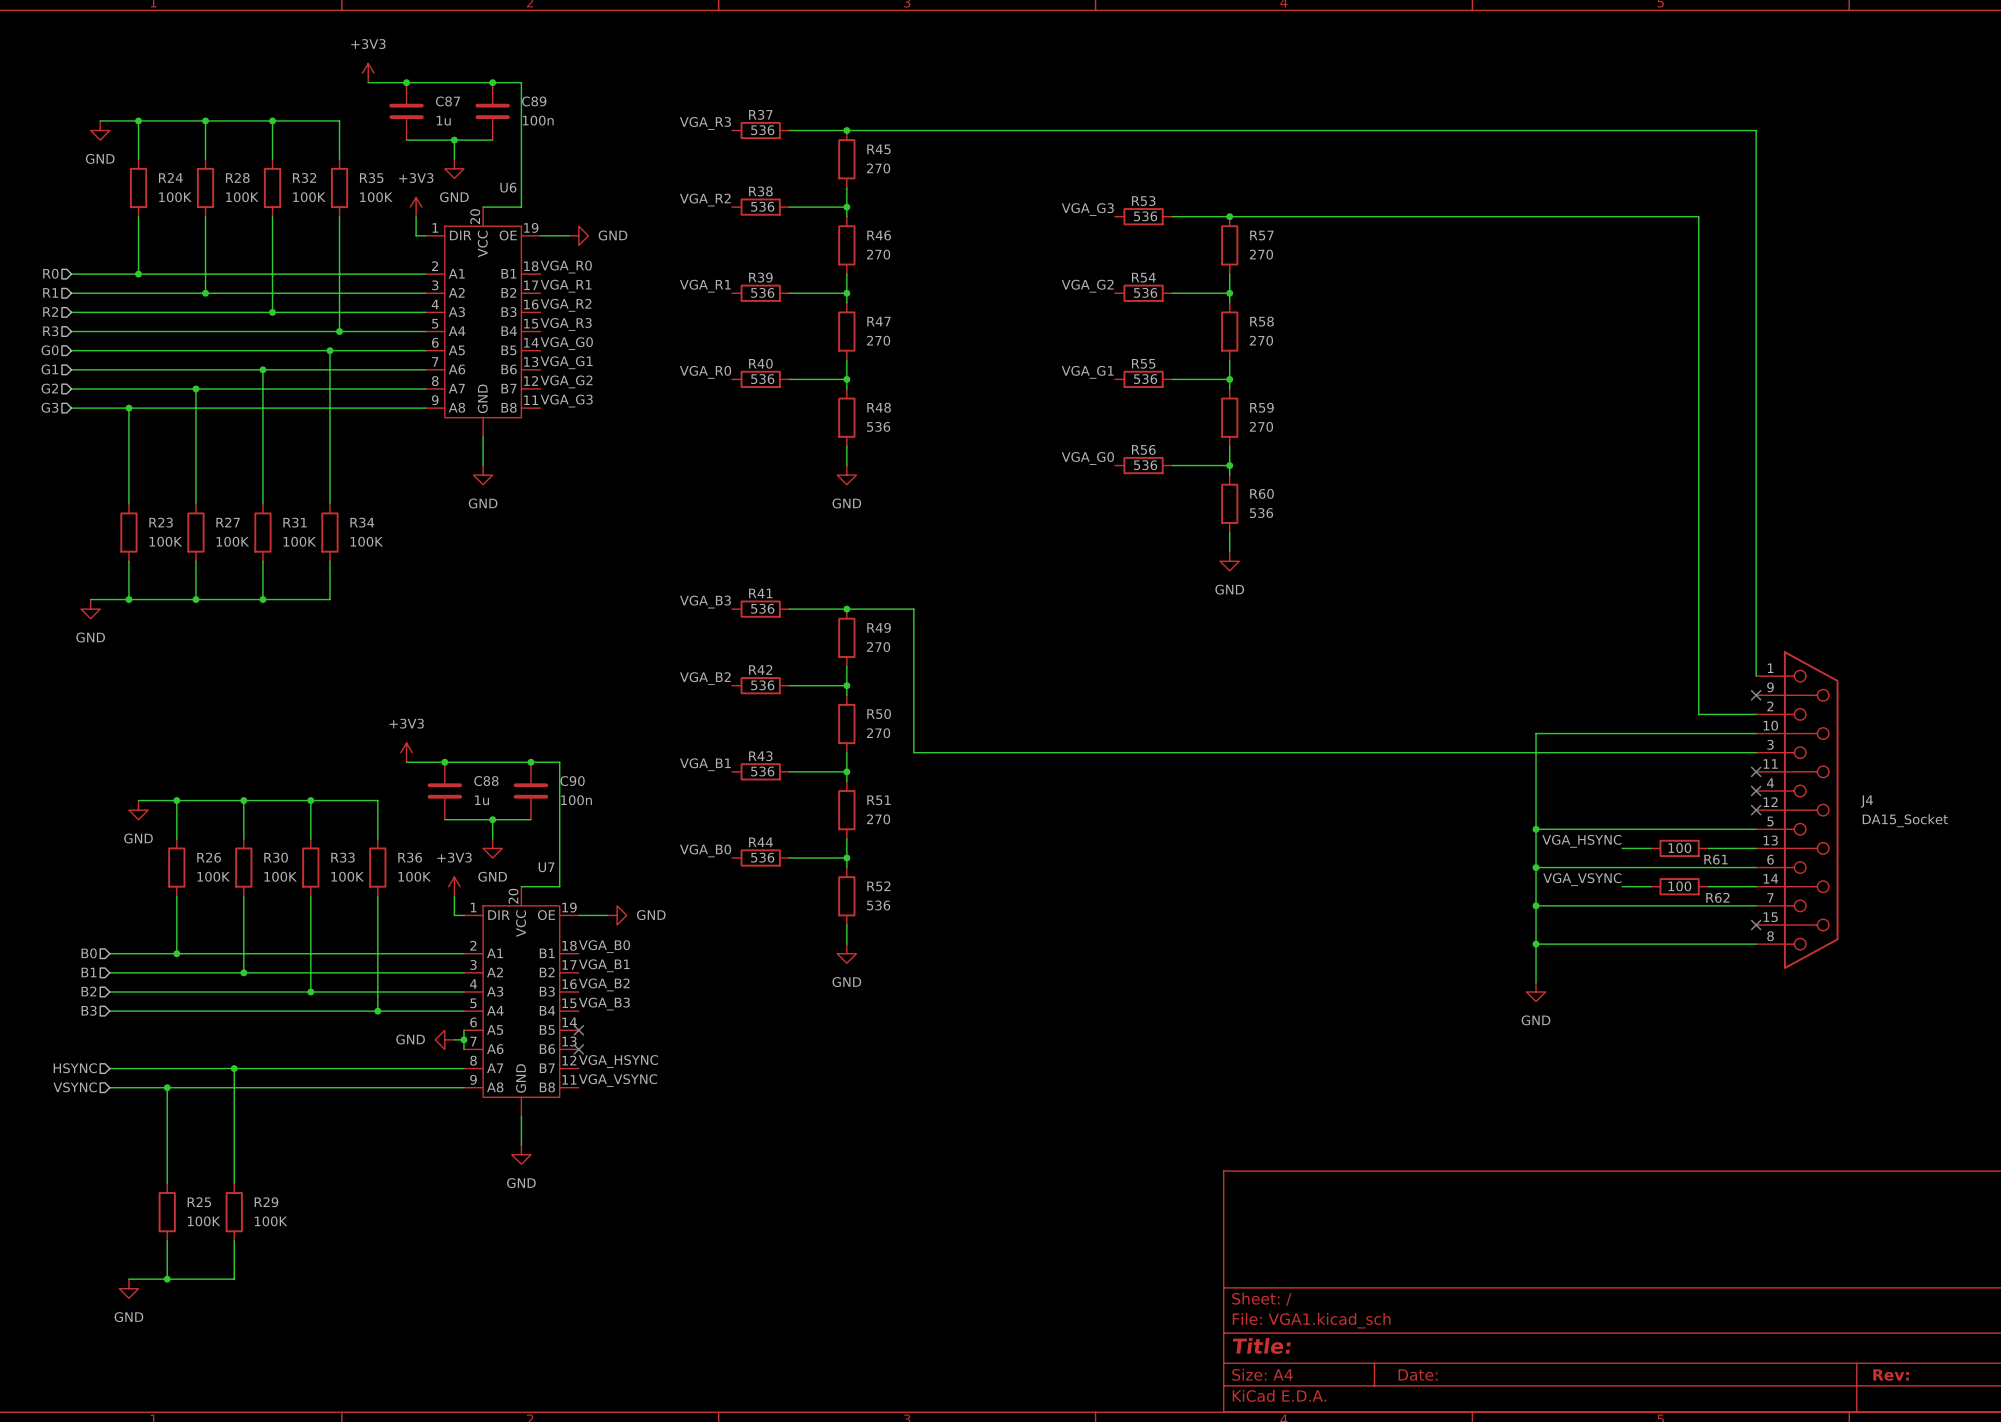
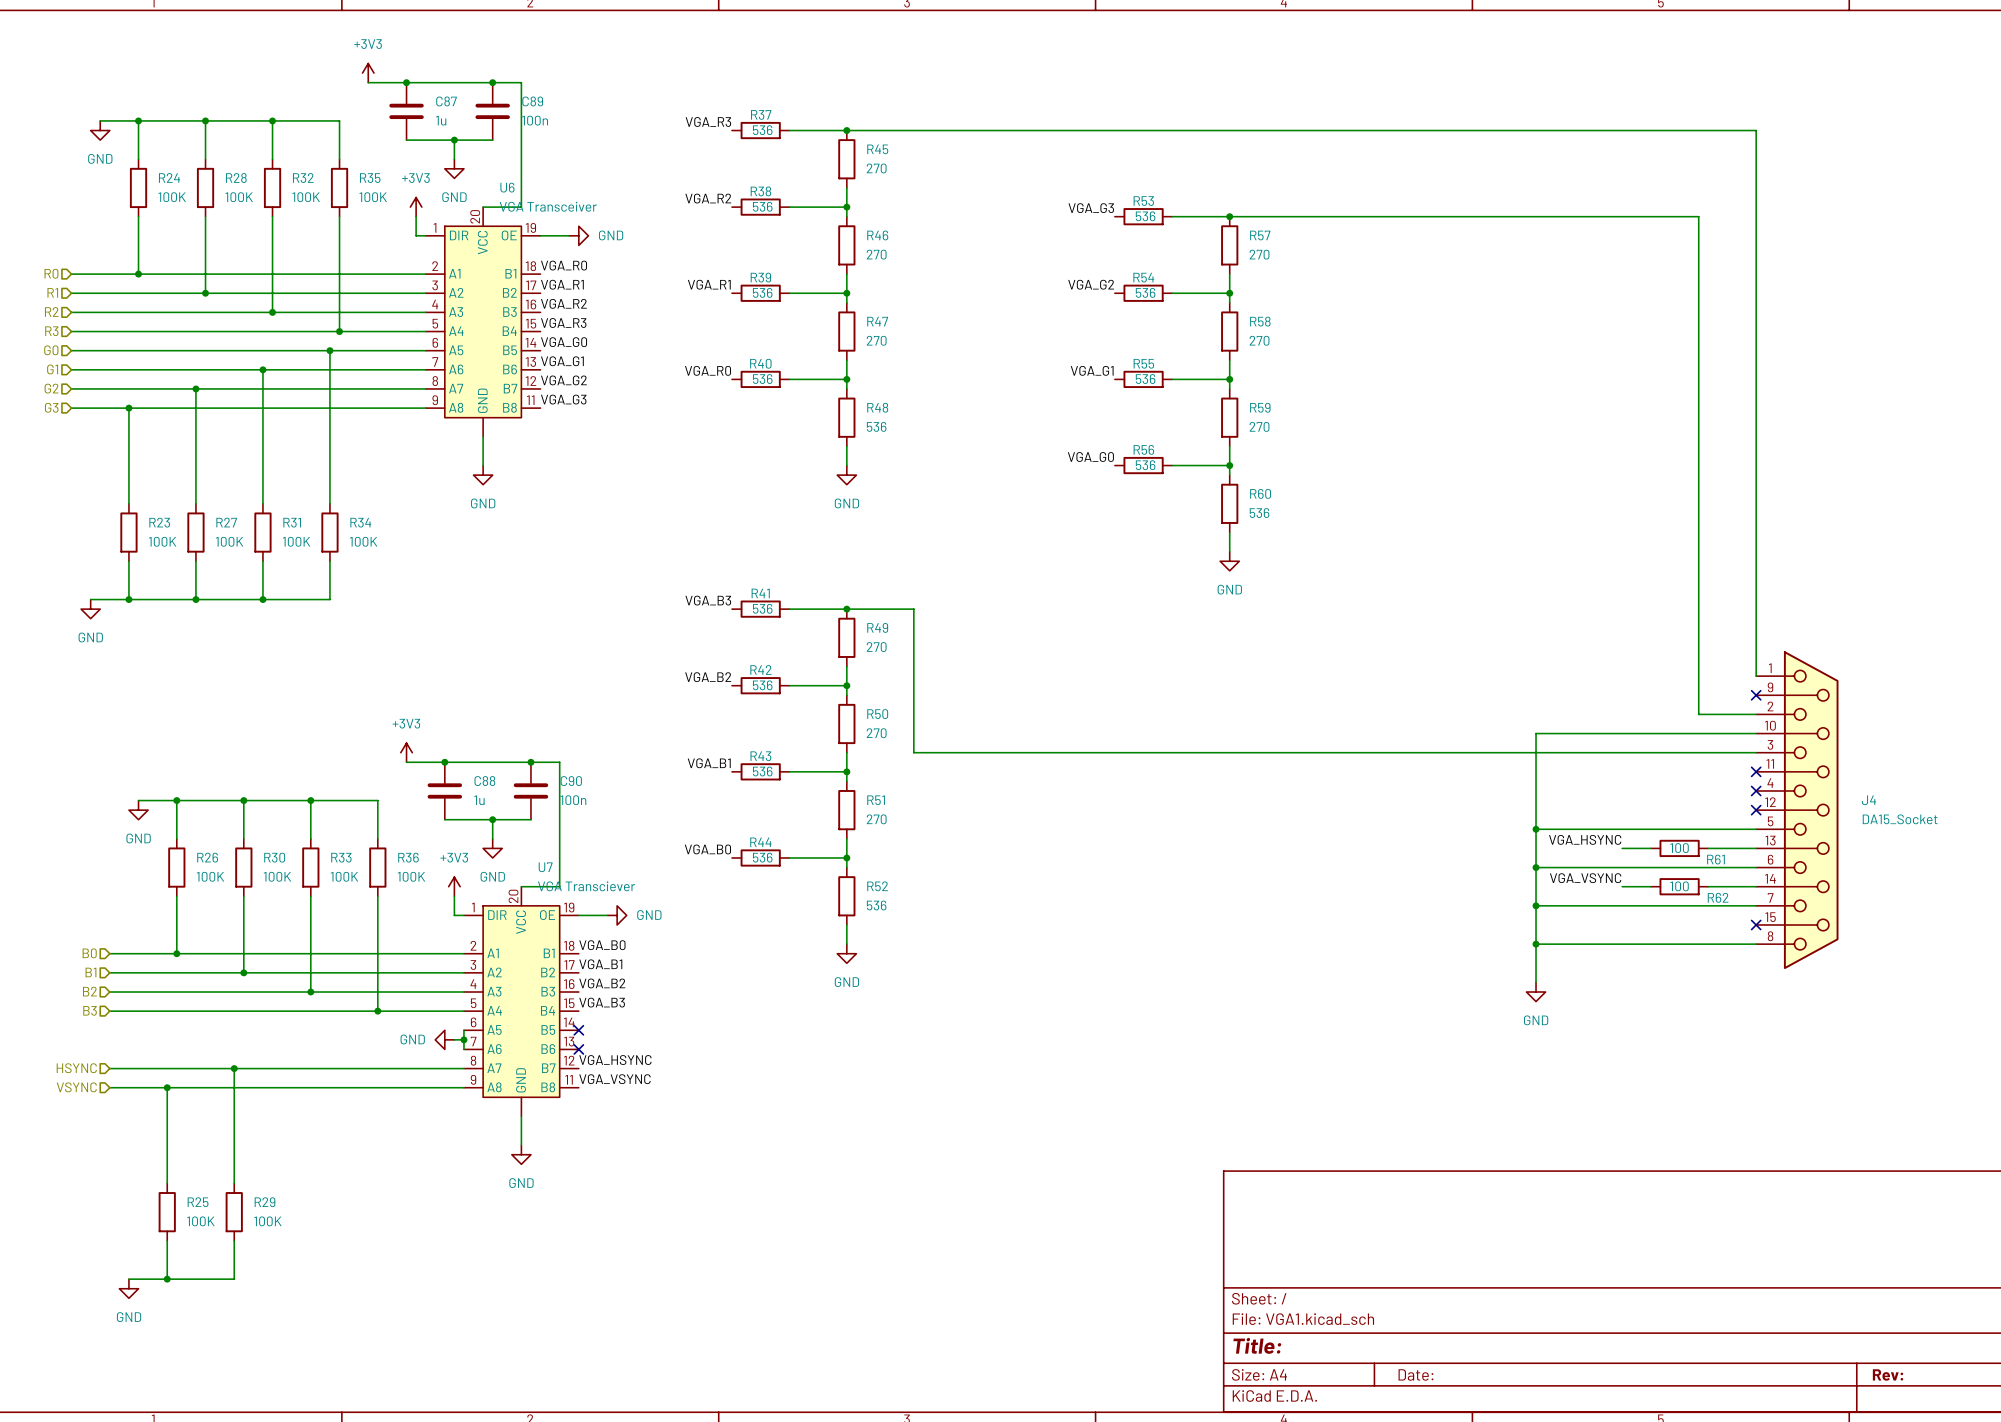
U6 value: none -> VGA Transceiver (548, 206)
U7 value: none -> VGA Transciever (586, 886)

